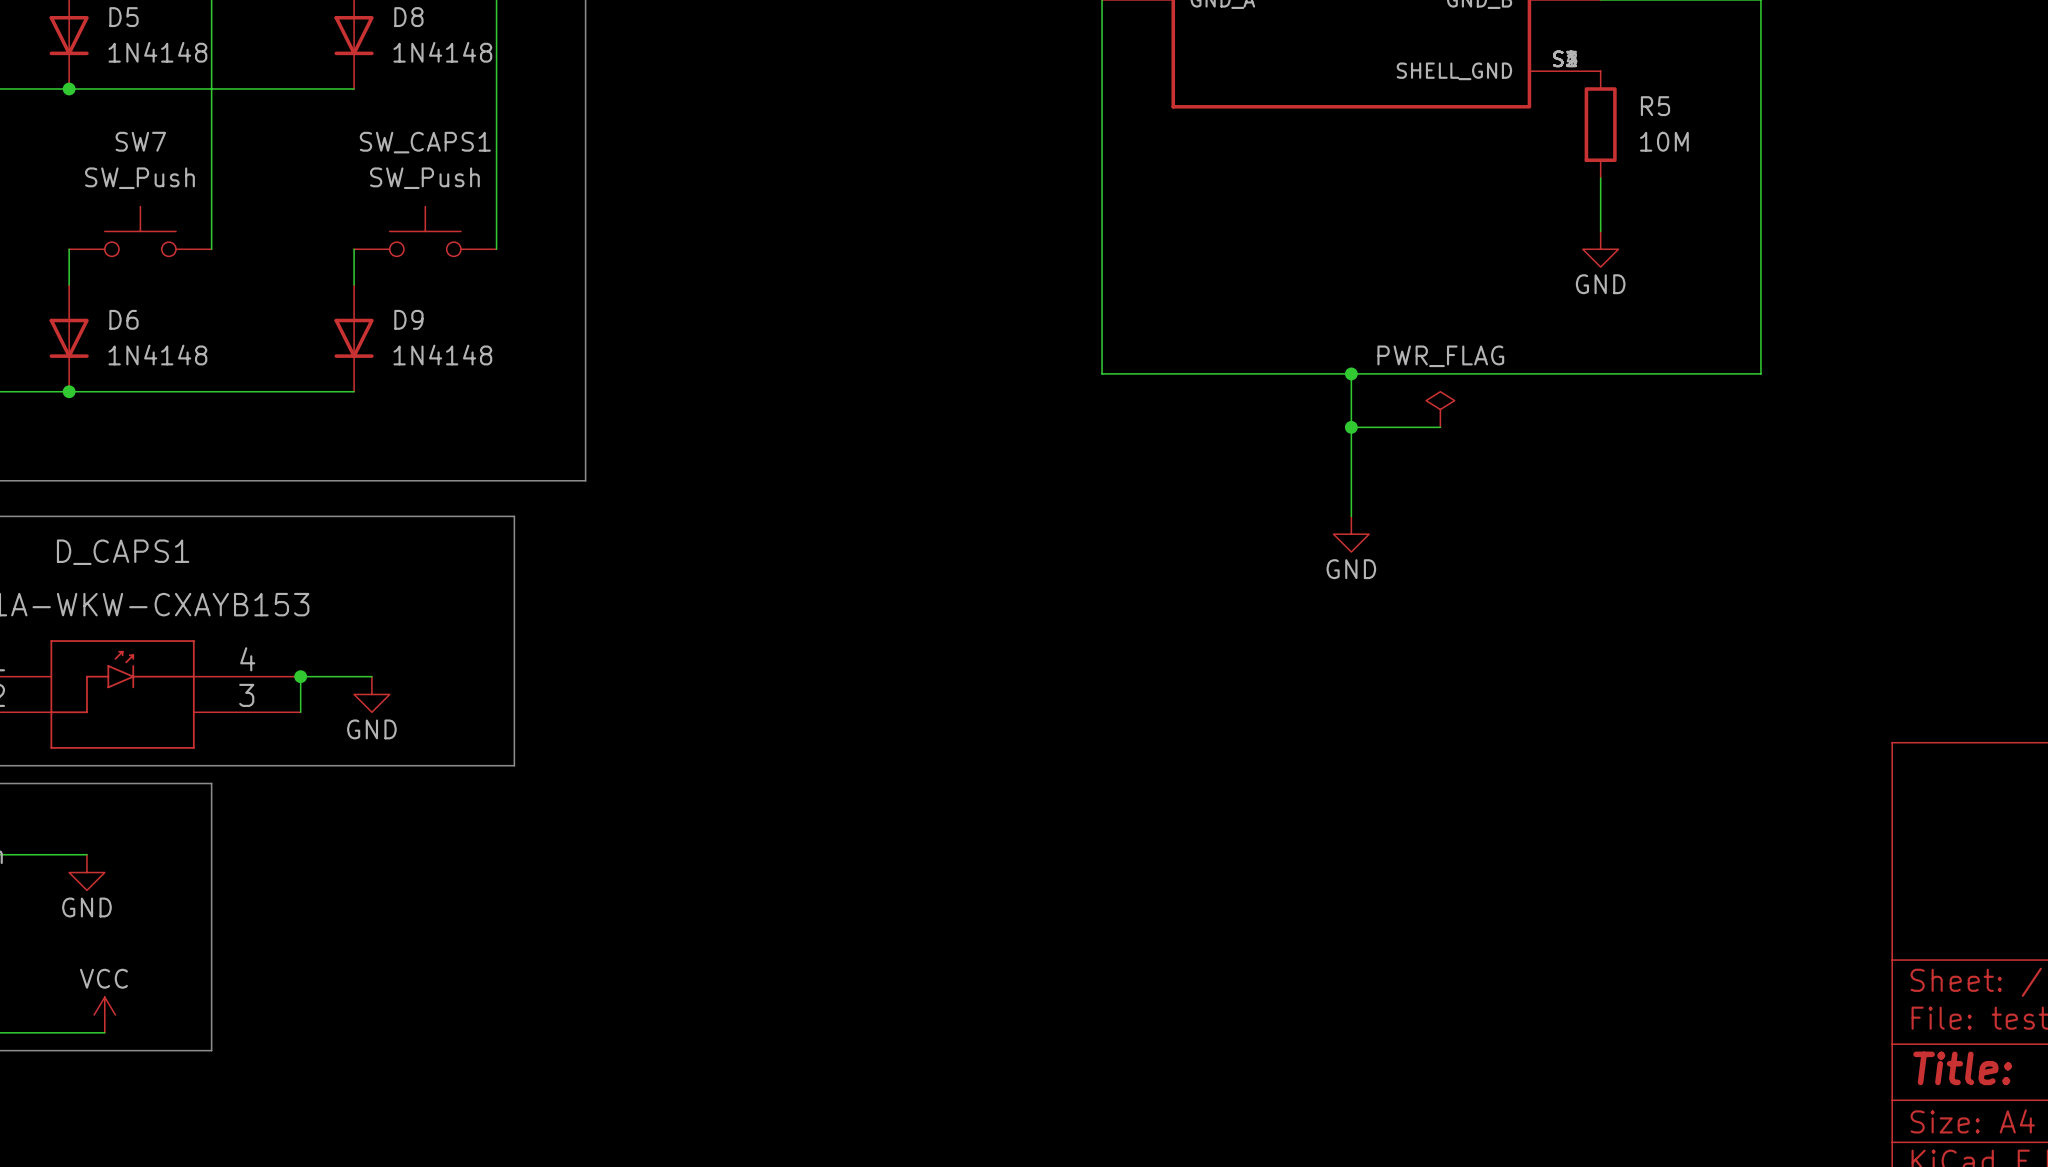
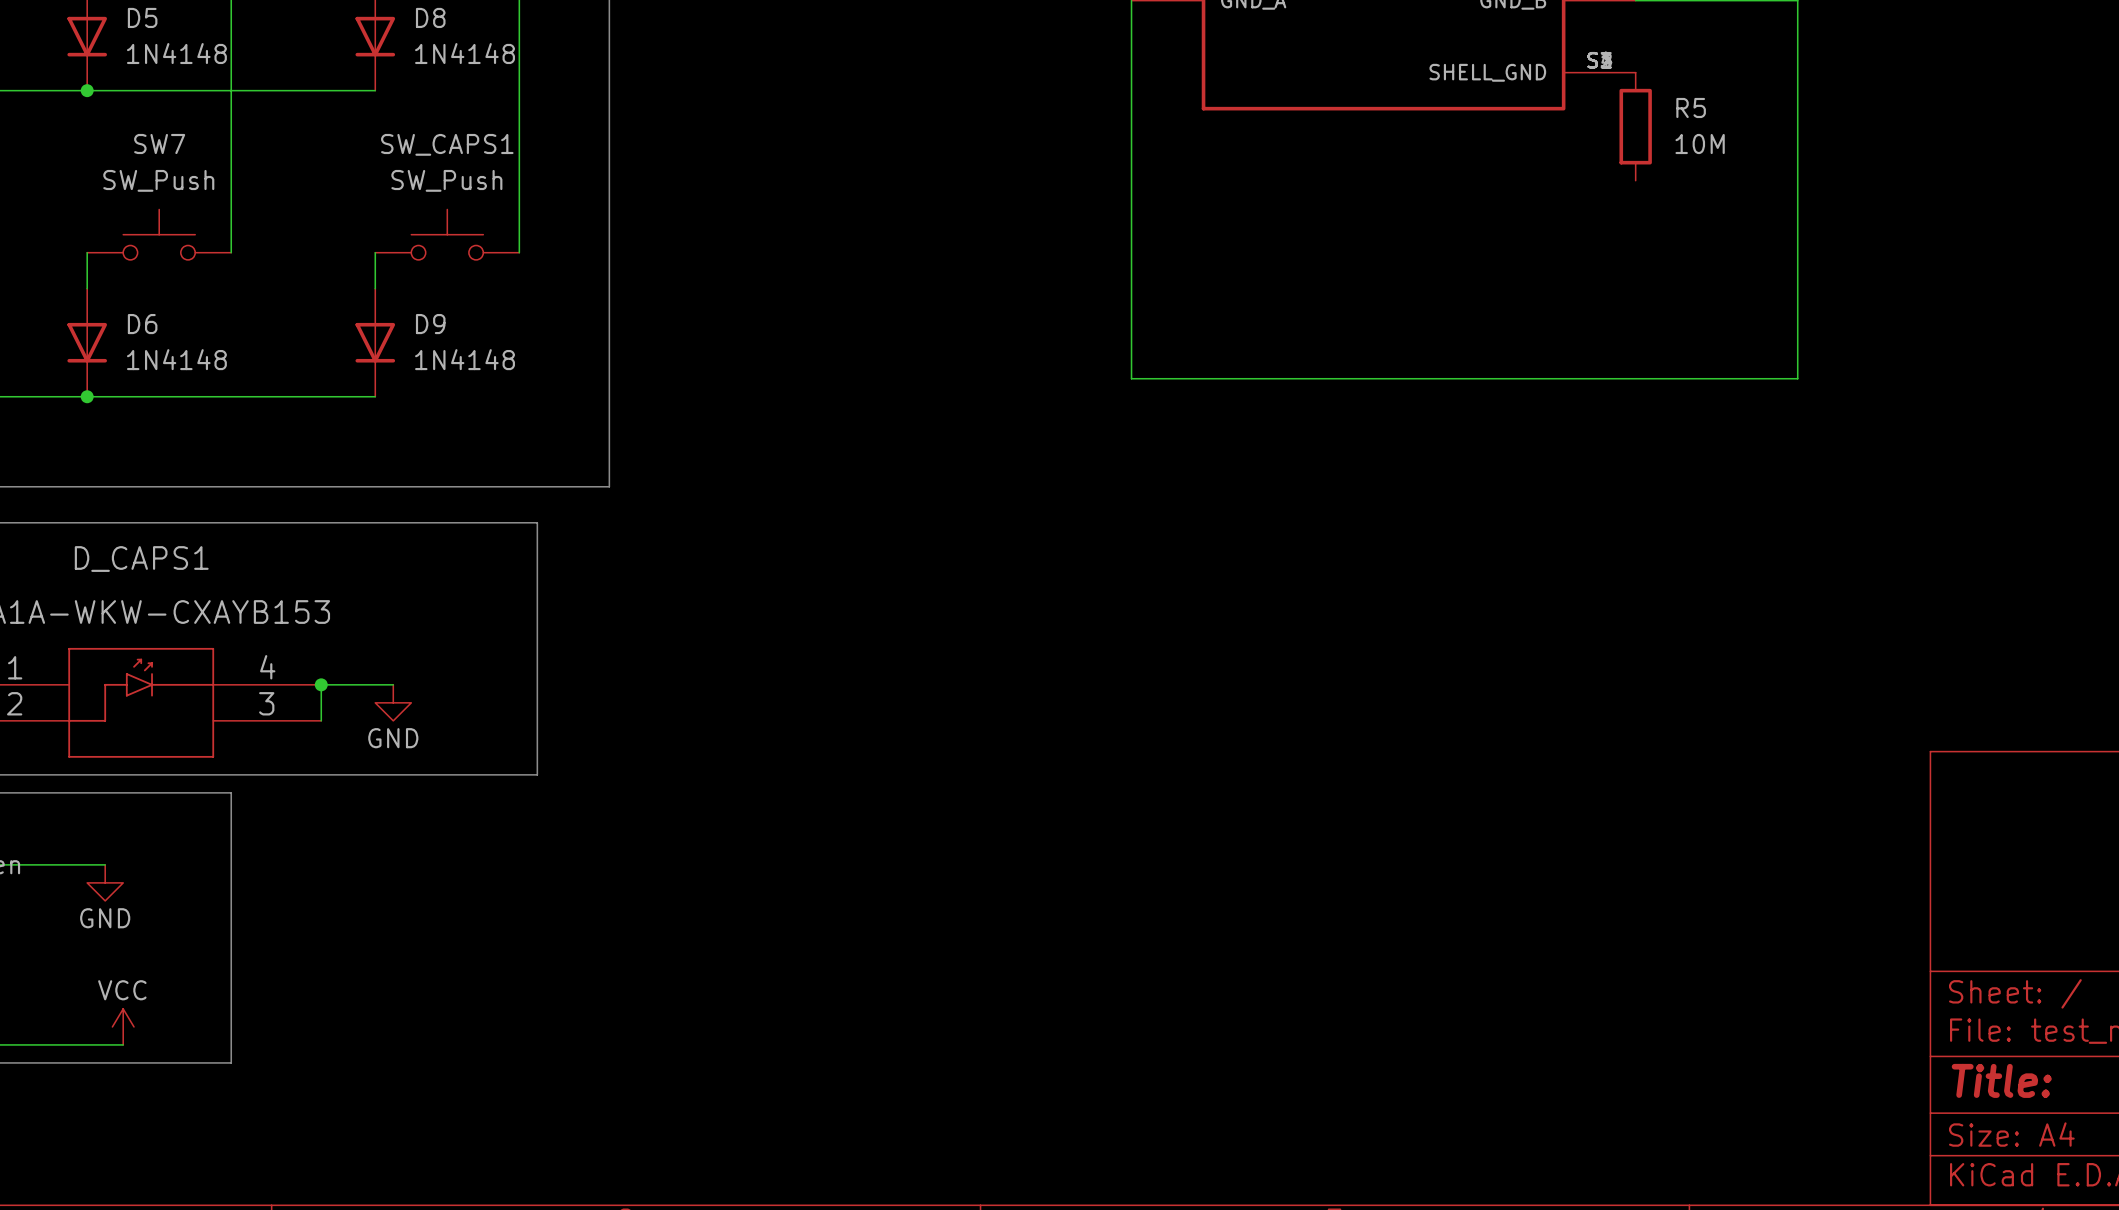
wire: (1600, 178) (1600, 231) -> none
power symbol: GND (1600, 249) -> none
wire: (1351, 373) (1351, 516) -> none
junction: (1351, 373) -> none
power symbol: PWR_FLAG (1440, 409) -> none
wire: (1351, 427) (1440, 427) -> none
junction: (1351, 427) -> none
power symbol: GND (1351, 534) -> none

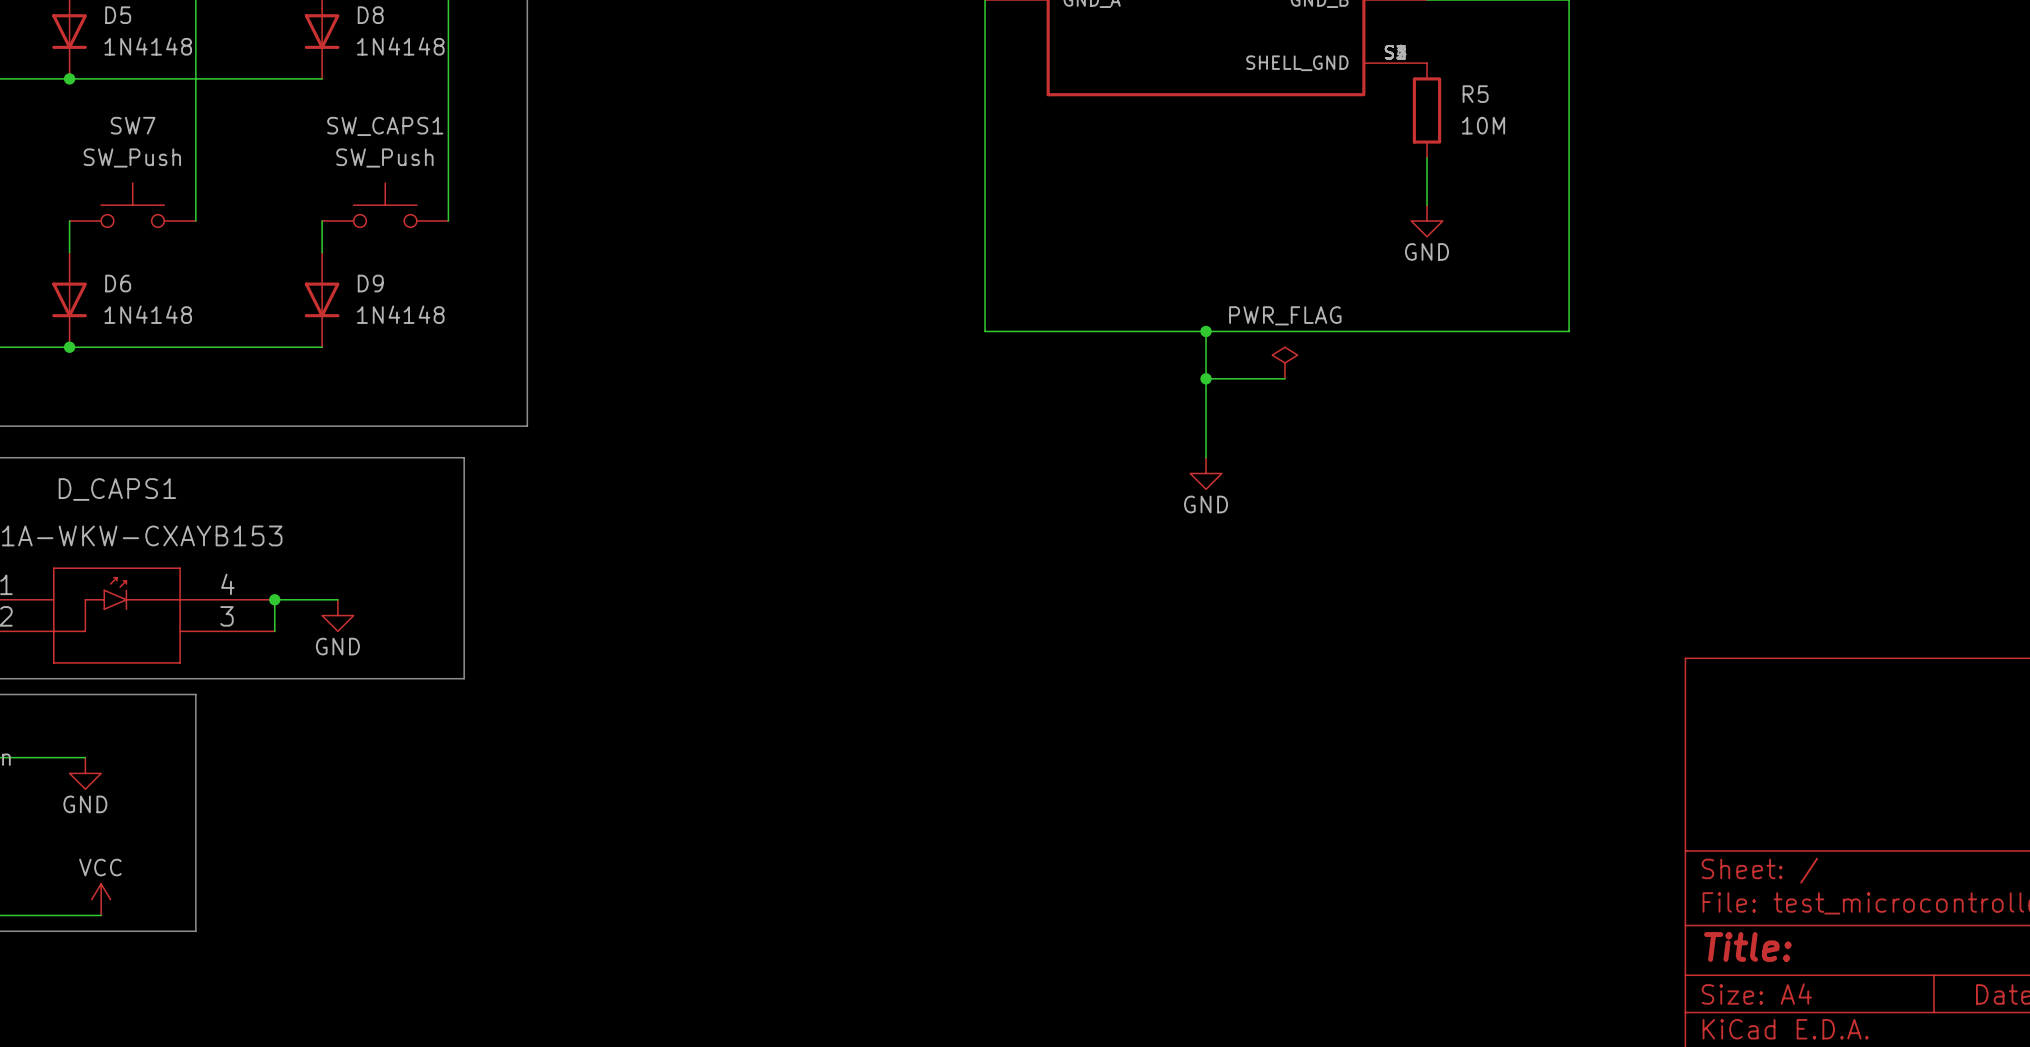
wire: none -> (1427, 157) (1427, 205)
power symbol: none -> GND (1427, 220)
wire: none -> (1206, 331) (1206, 457)
junction: none -> (1206, 331)
power symbol: none -> PWR_FLAG (1284, 363)
wire: none -> (1206, 378) (1284, 378)
junction: none -> (1206, 378)
power symbol: none -> GND (1206, 473)

